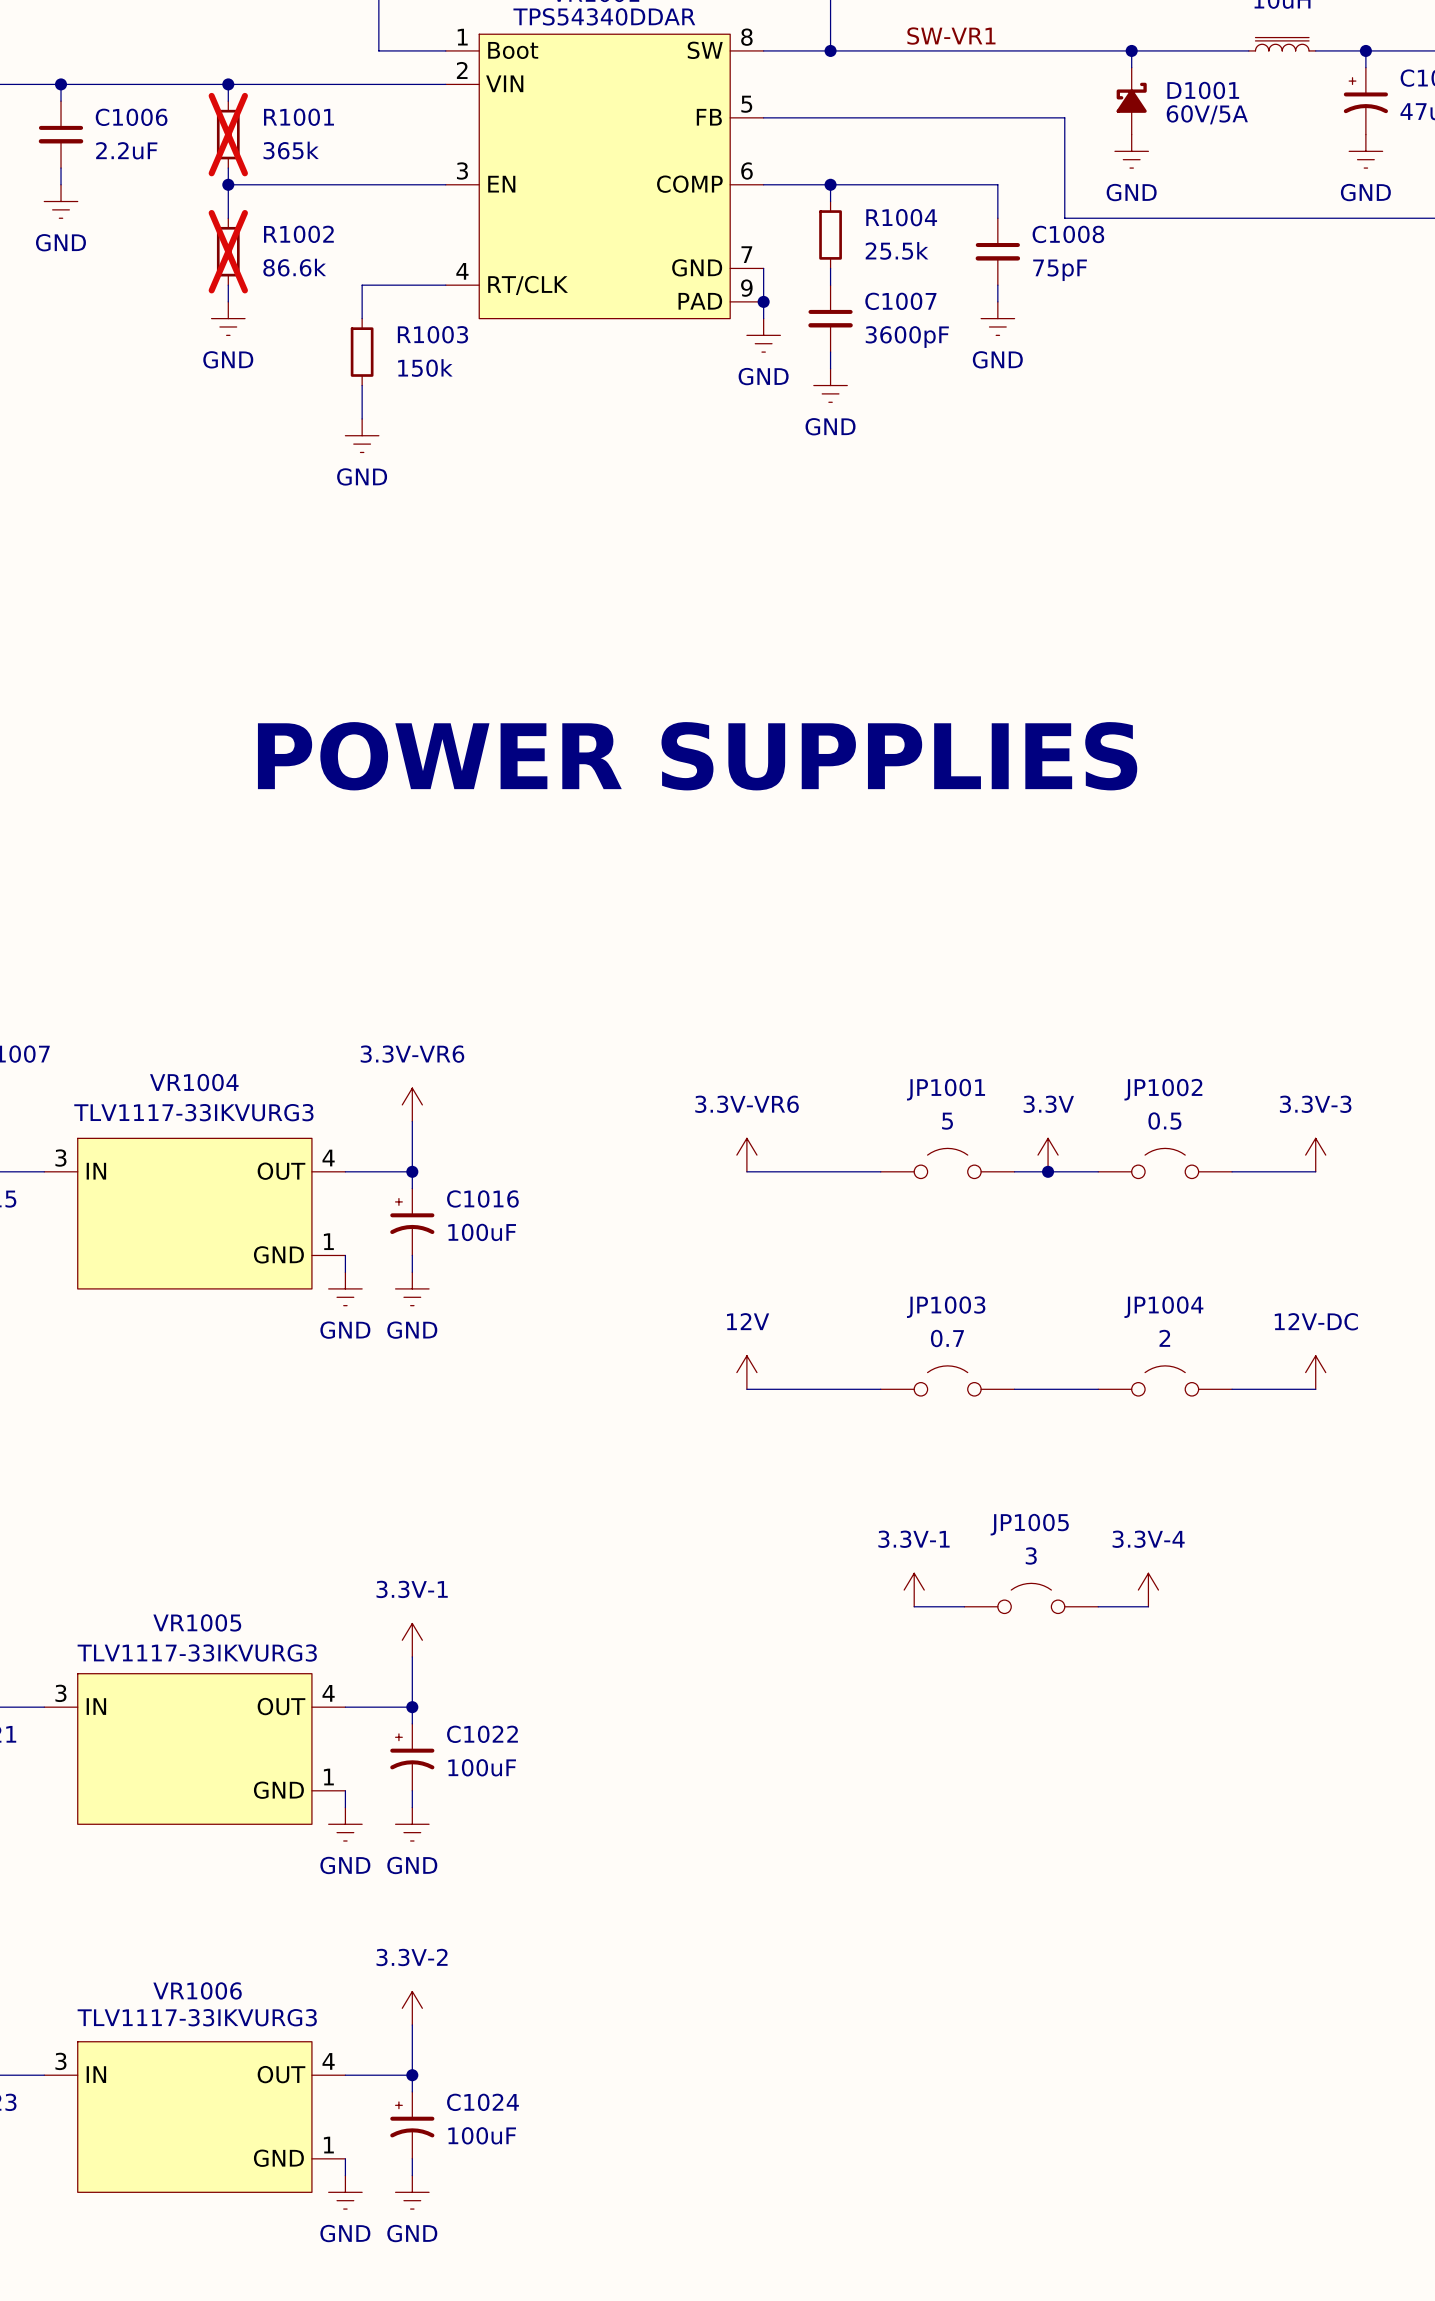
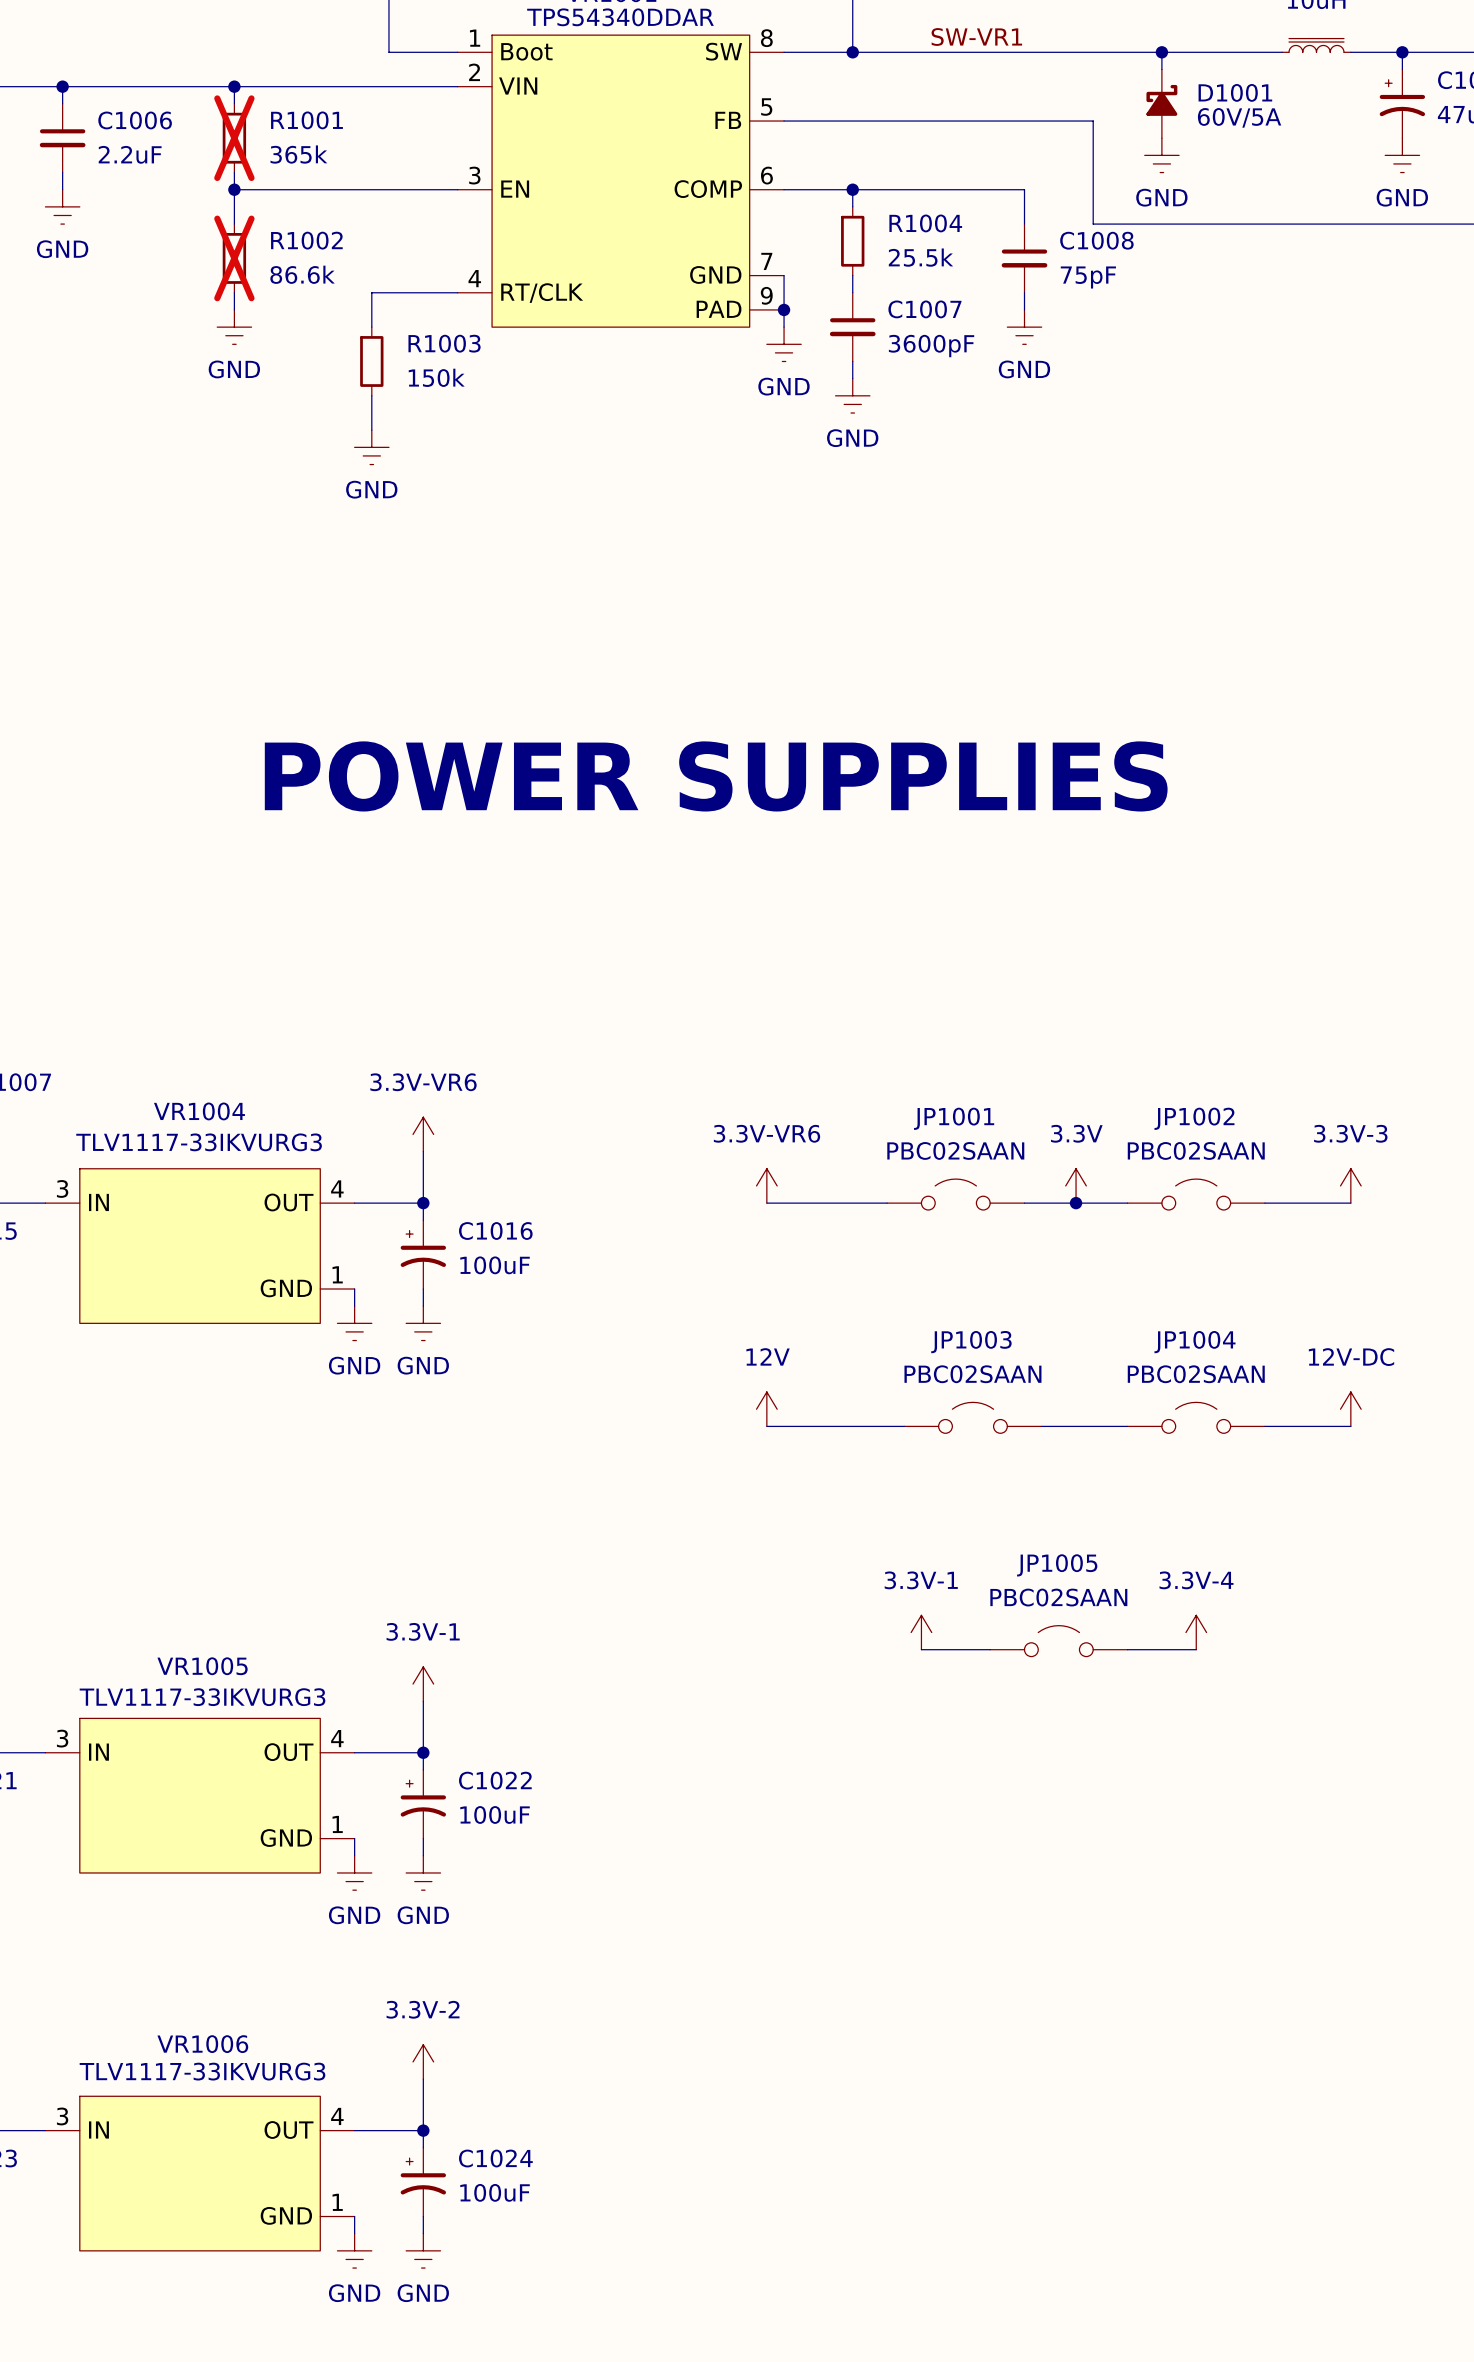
JP1001 value: 5 (947, 1121) -> PBC02SAAN (955, 1150)
JP1002 value: 0.5 (1164, 1121) -> PBC02SAAN (1196, 1150)
JP1001 position: (947, 1163) -> (955, 1194)
JP1003 value: 0.7 (947, 1338) -> PBC02SAAN (972, 1374)
JP1004 value: 2 (1164, 1338) -> PBC02SAAN (1196, 1374)
JP1005 value: 3 (1031, 1555) -> PBC02SAAN (1058, 1597)
power symbol position: 3.3V-1 (914, 1590) -> 3.3V-1 (921, 1632)
power symbol position: 3.3V-4 (1148, 1590) -> 3.3V-4 (1196, 1632)
wire: none -> (921, 1649) (938, 1649)
wire: none -> (1179, 1649) (1196, 1649)

